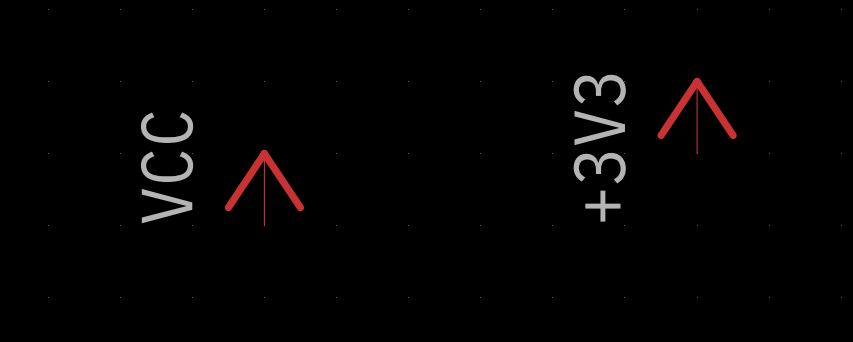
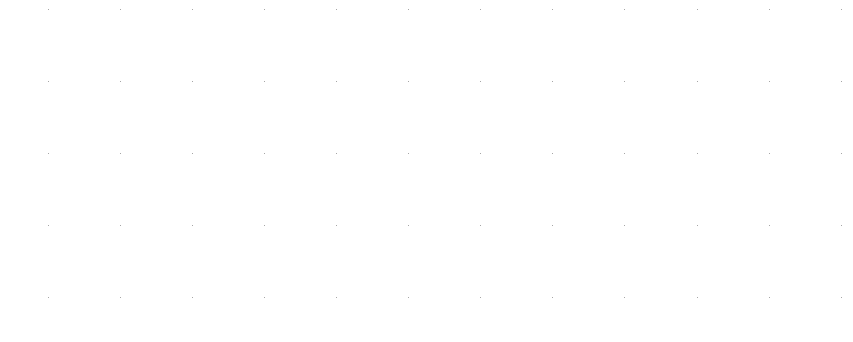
power symbol: +3V3 (697, 115) -> none
power symbol: VCC (264, 187) -> none

